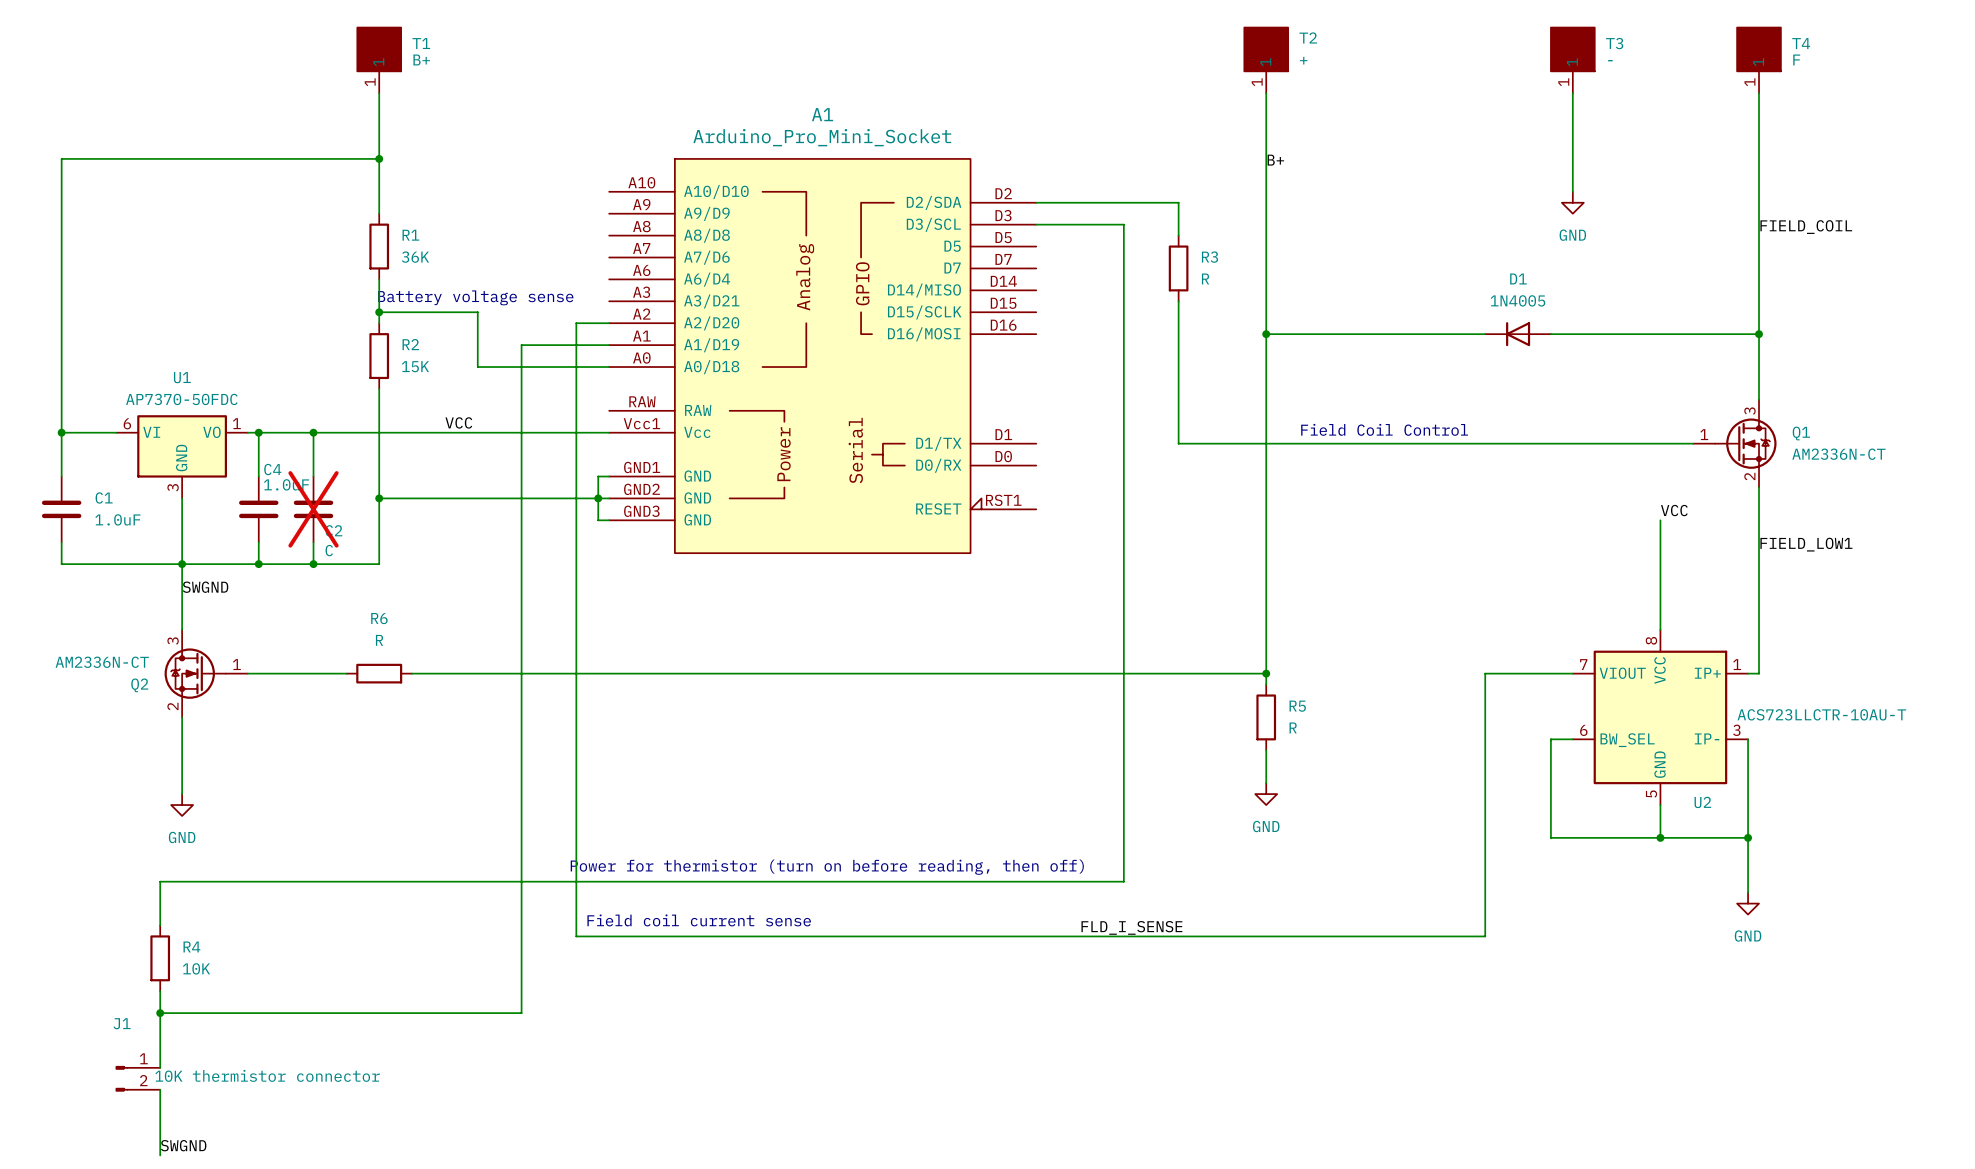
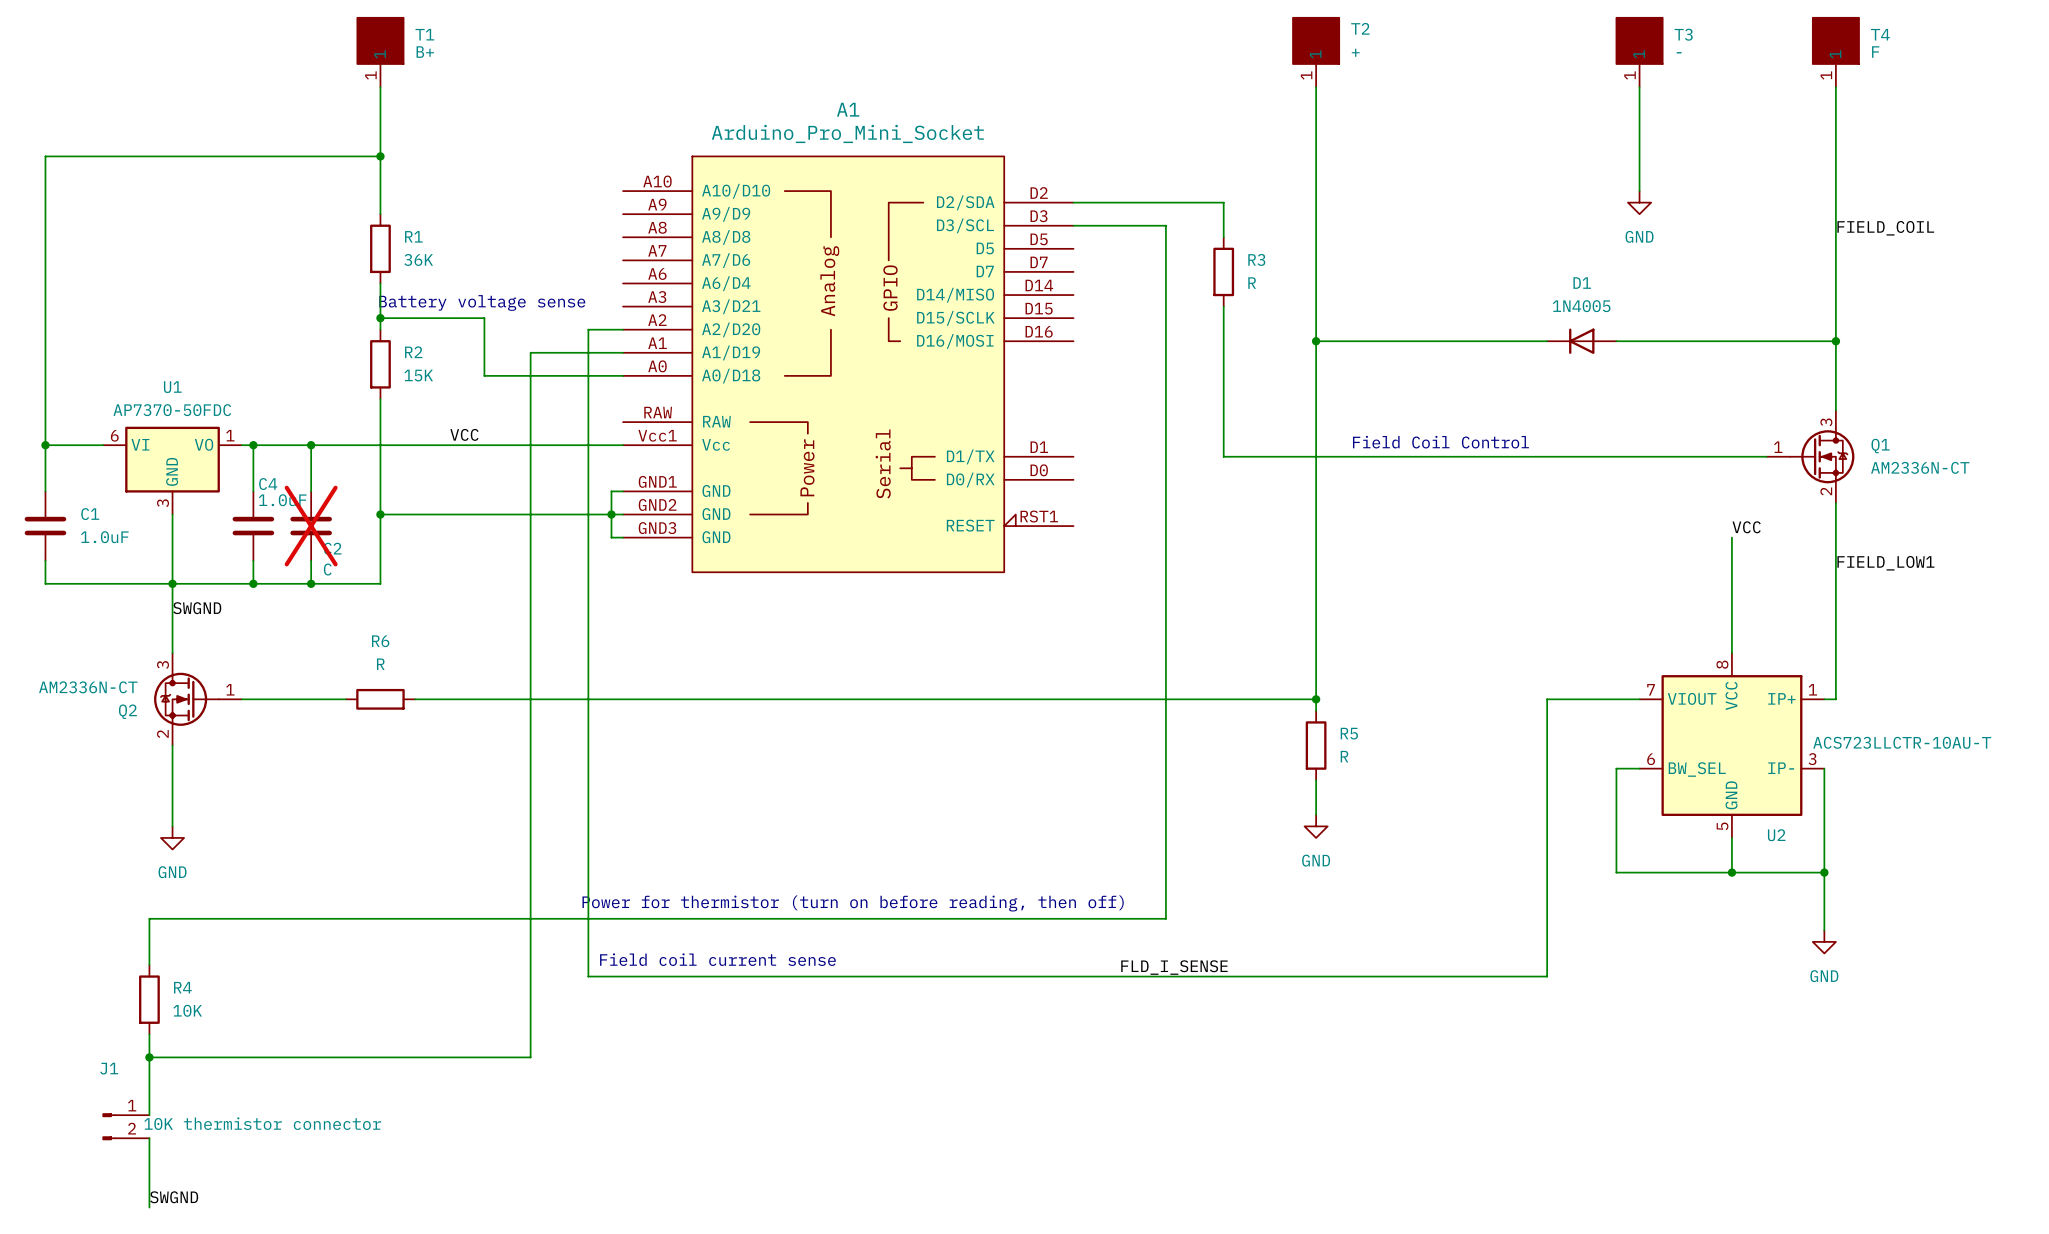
label: B+ (1275, 160) -> none

